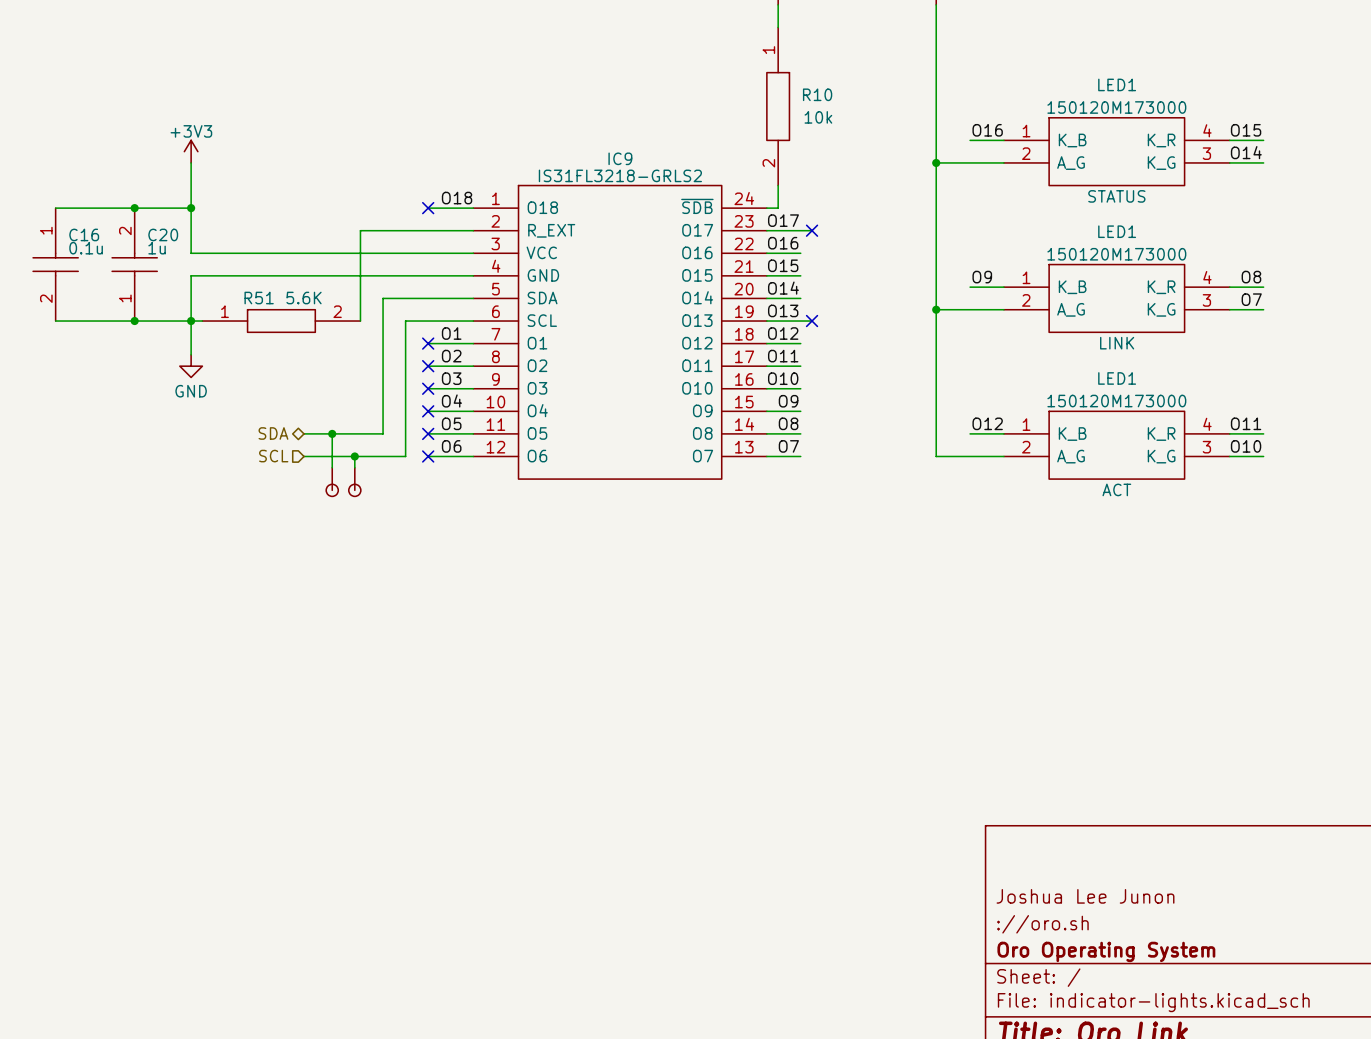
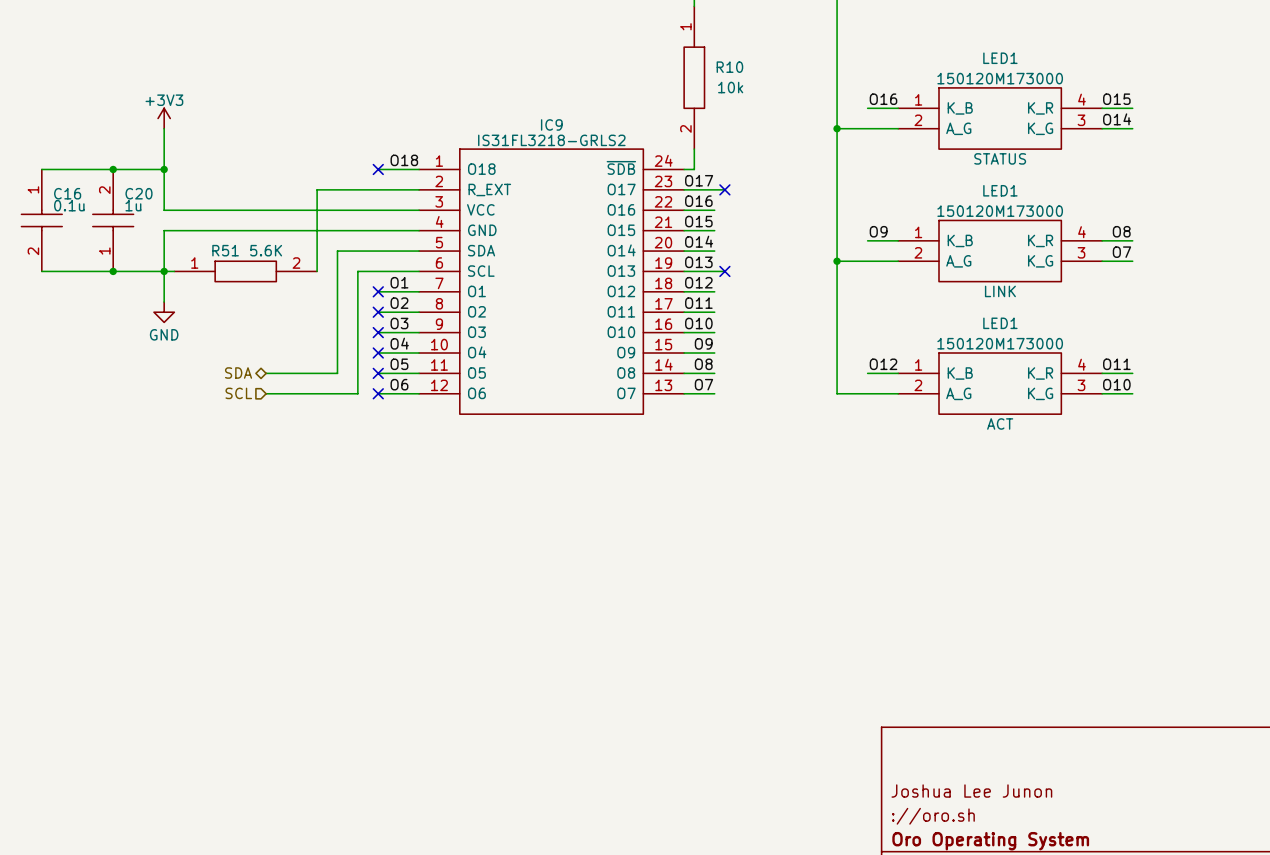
wire: (332, 433) (332, 467) -> none
junction: (332, 433) -> none
wire: (354, 456) (354, 467) -> none
junction: (354, 456) -> none
part: (332, 482) -> none
part: (354, 482) -> none

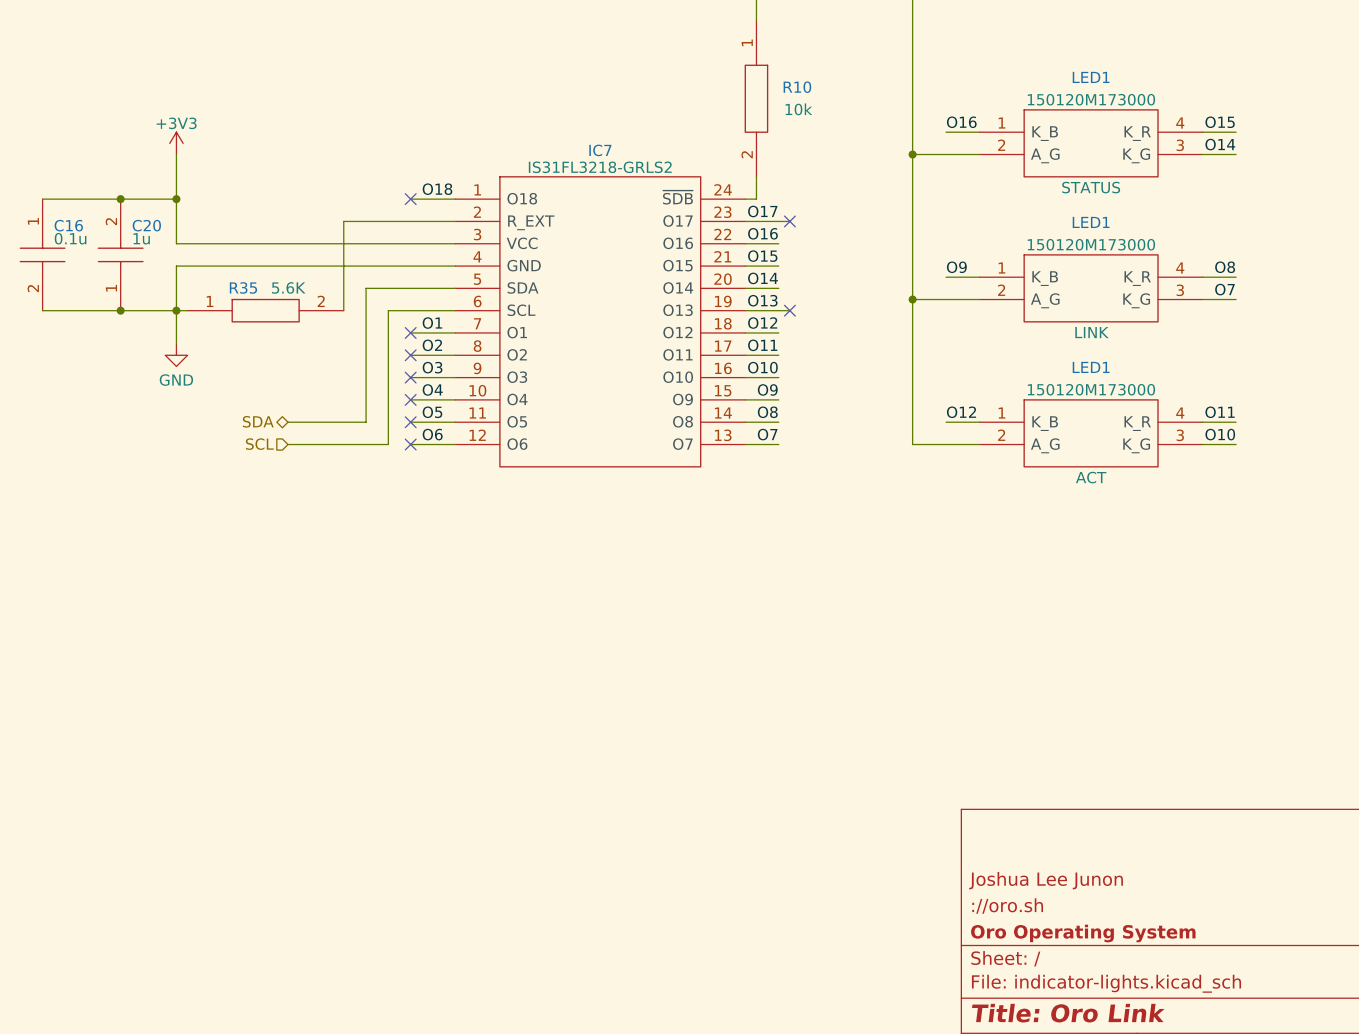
IC9 name: IC9 (551, 124) -> IC7 (600, 150)
R51 name: R51 (225, 250) -> R35 (243, 287)

